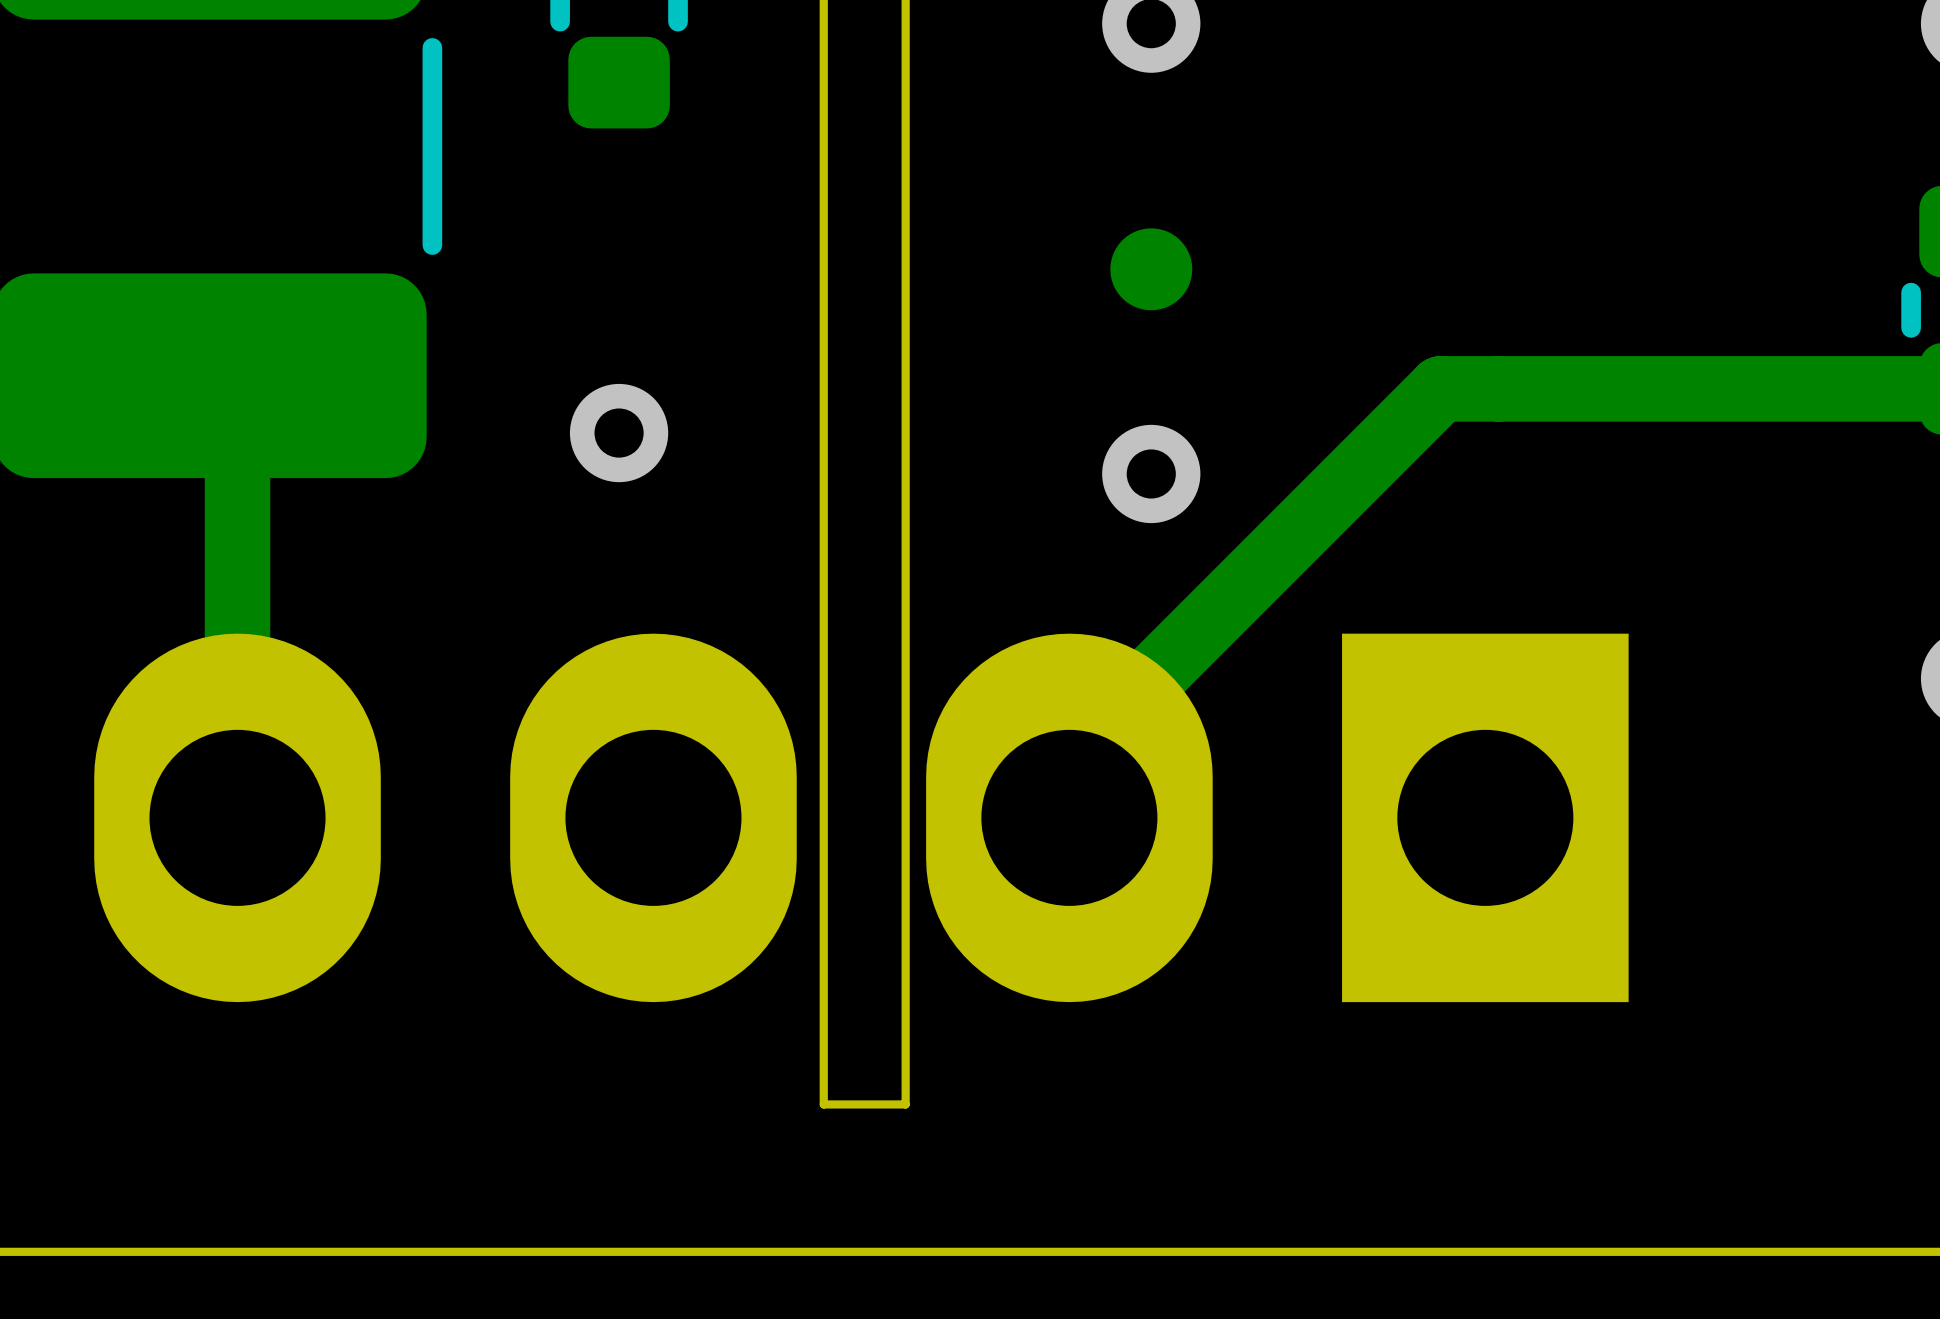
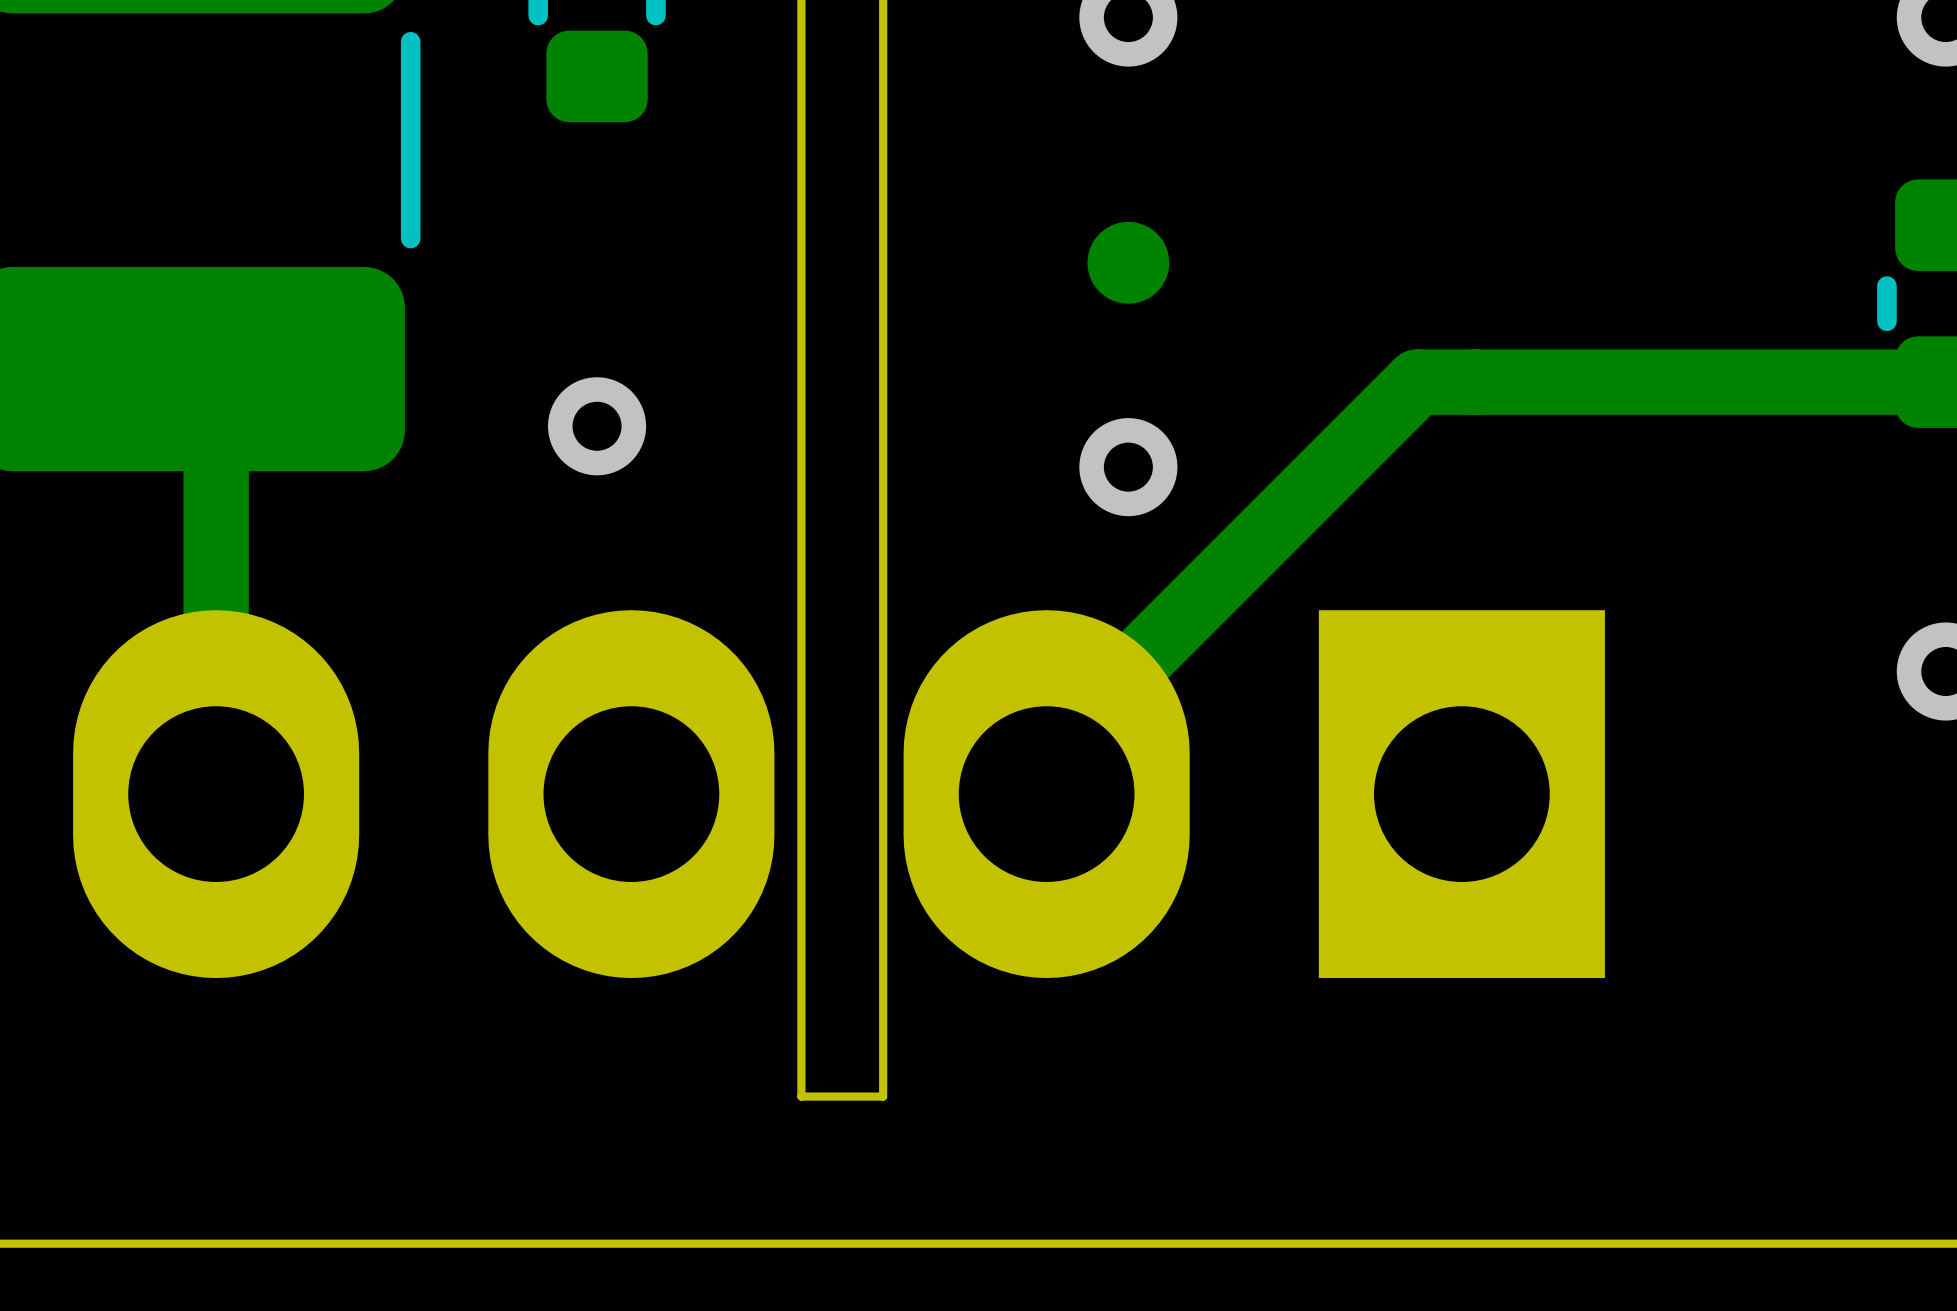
part position: (861, 817) -> (839, 794)

